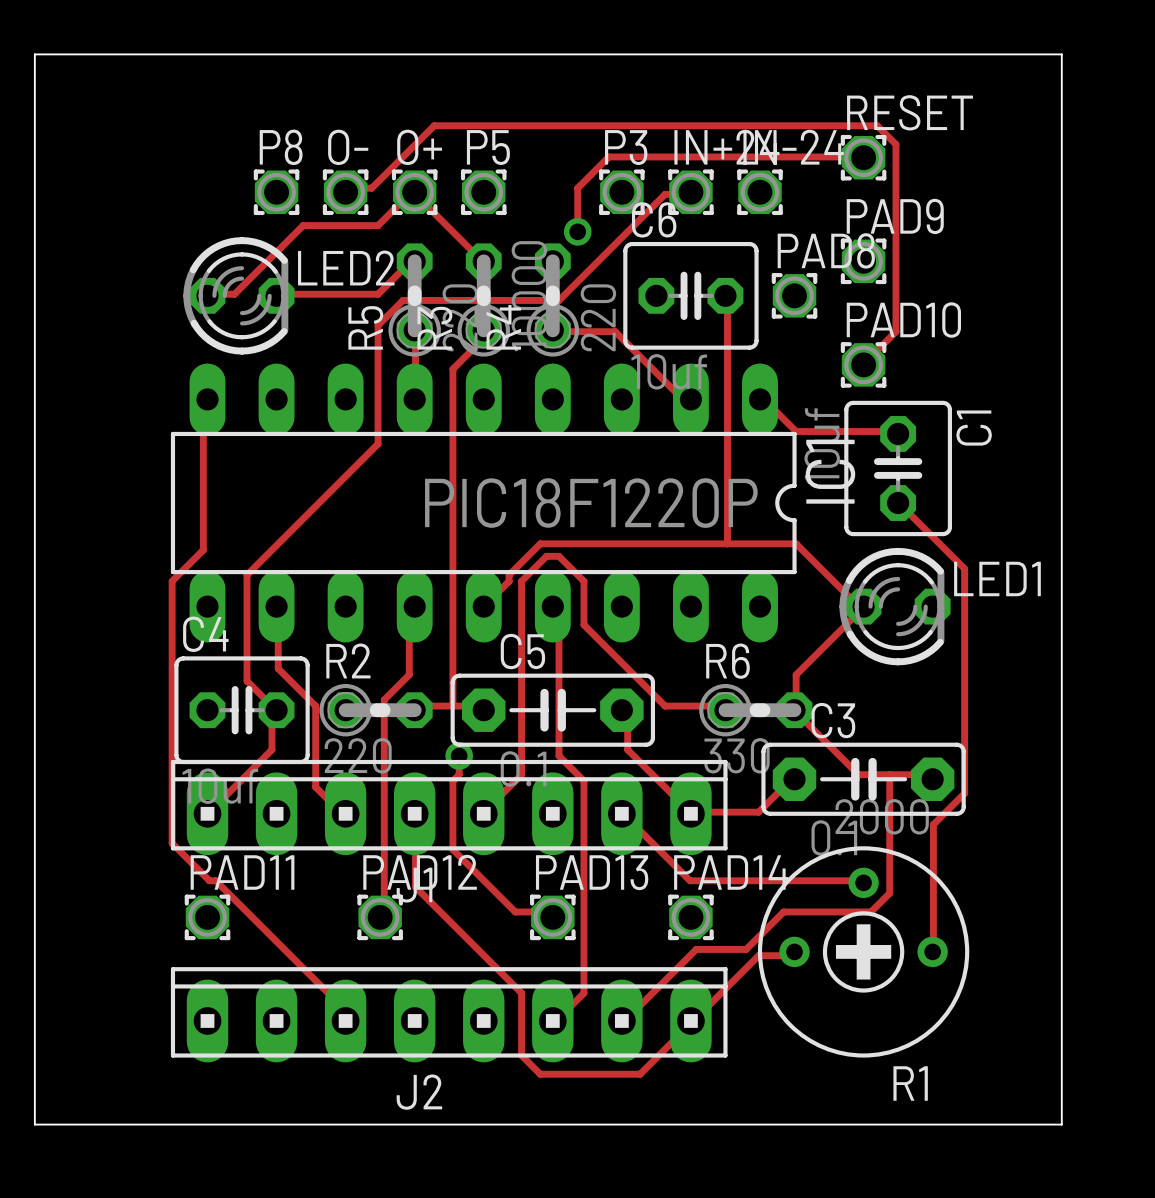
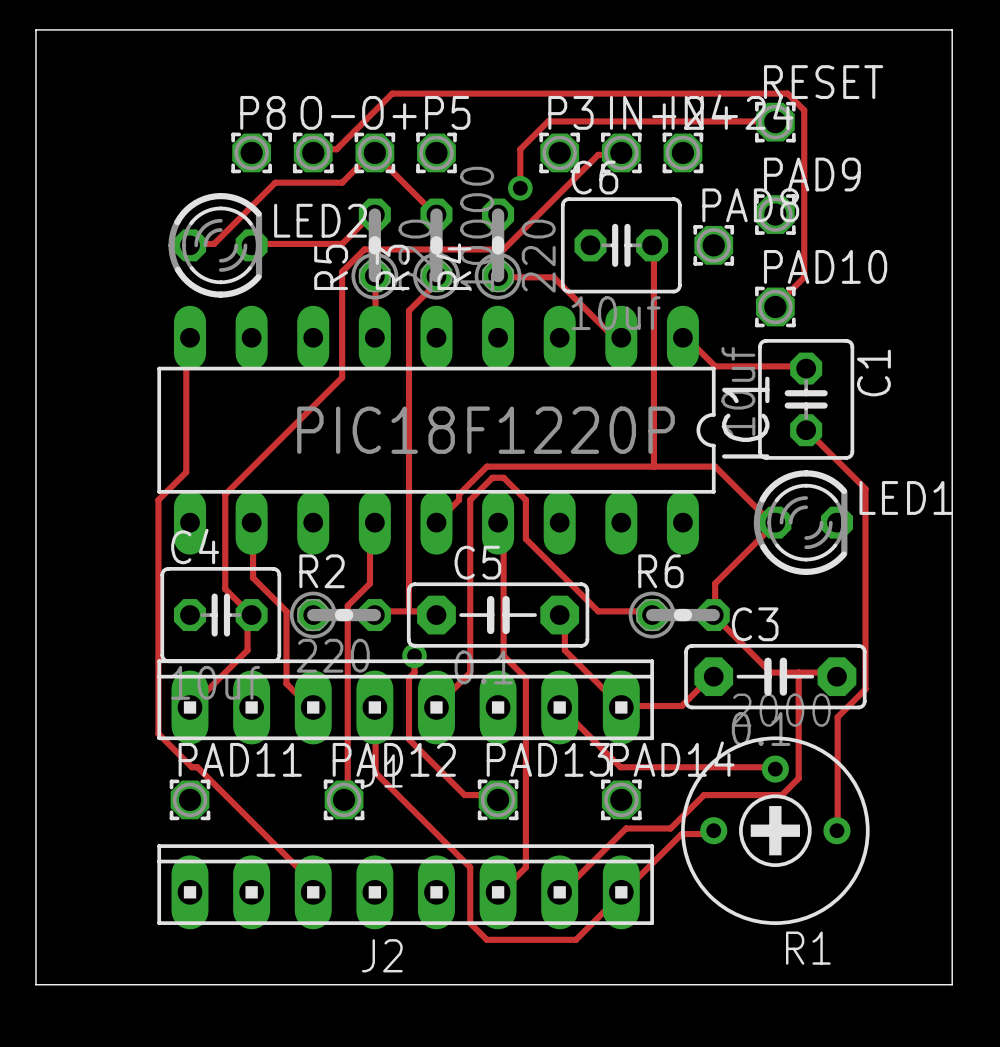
R6 value: 330 (736, 755) -> none

